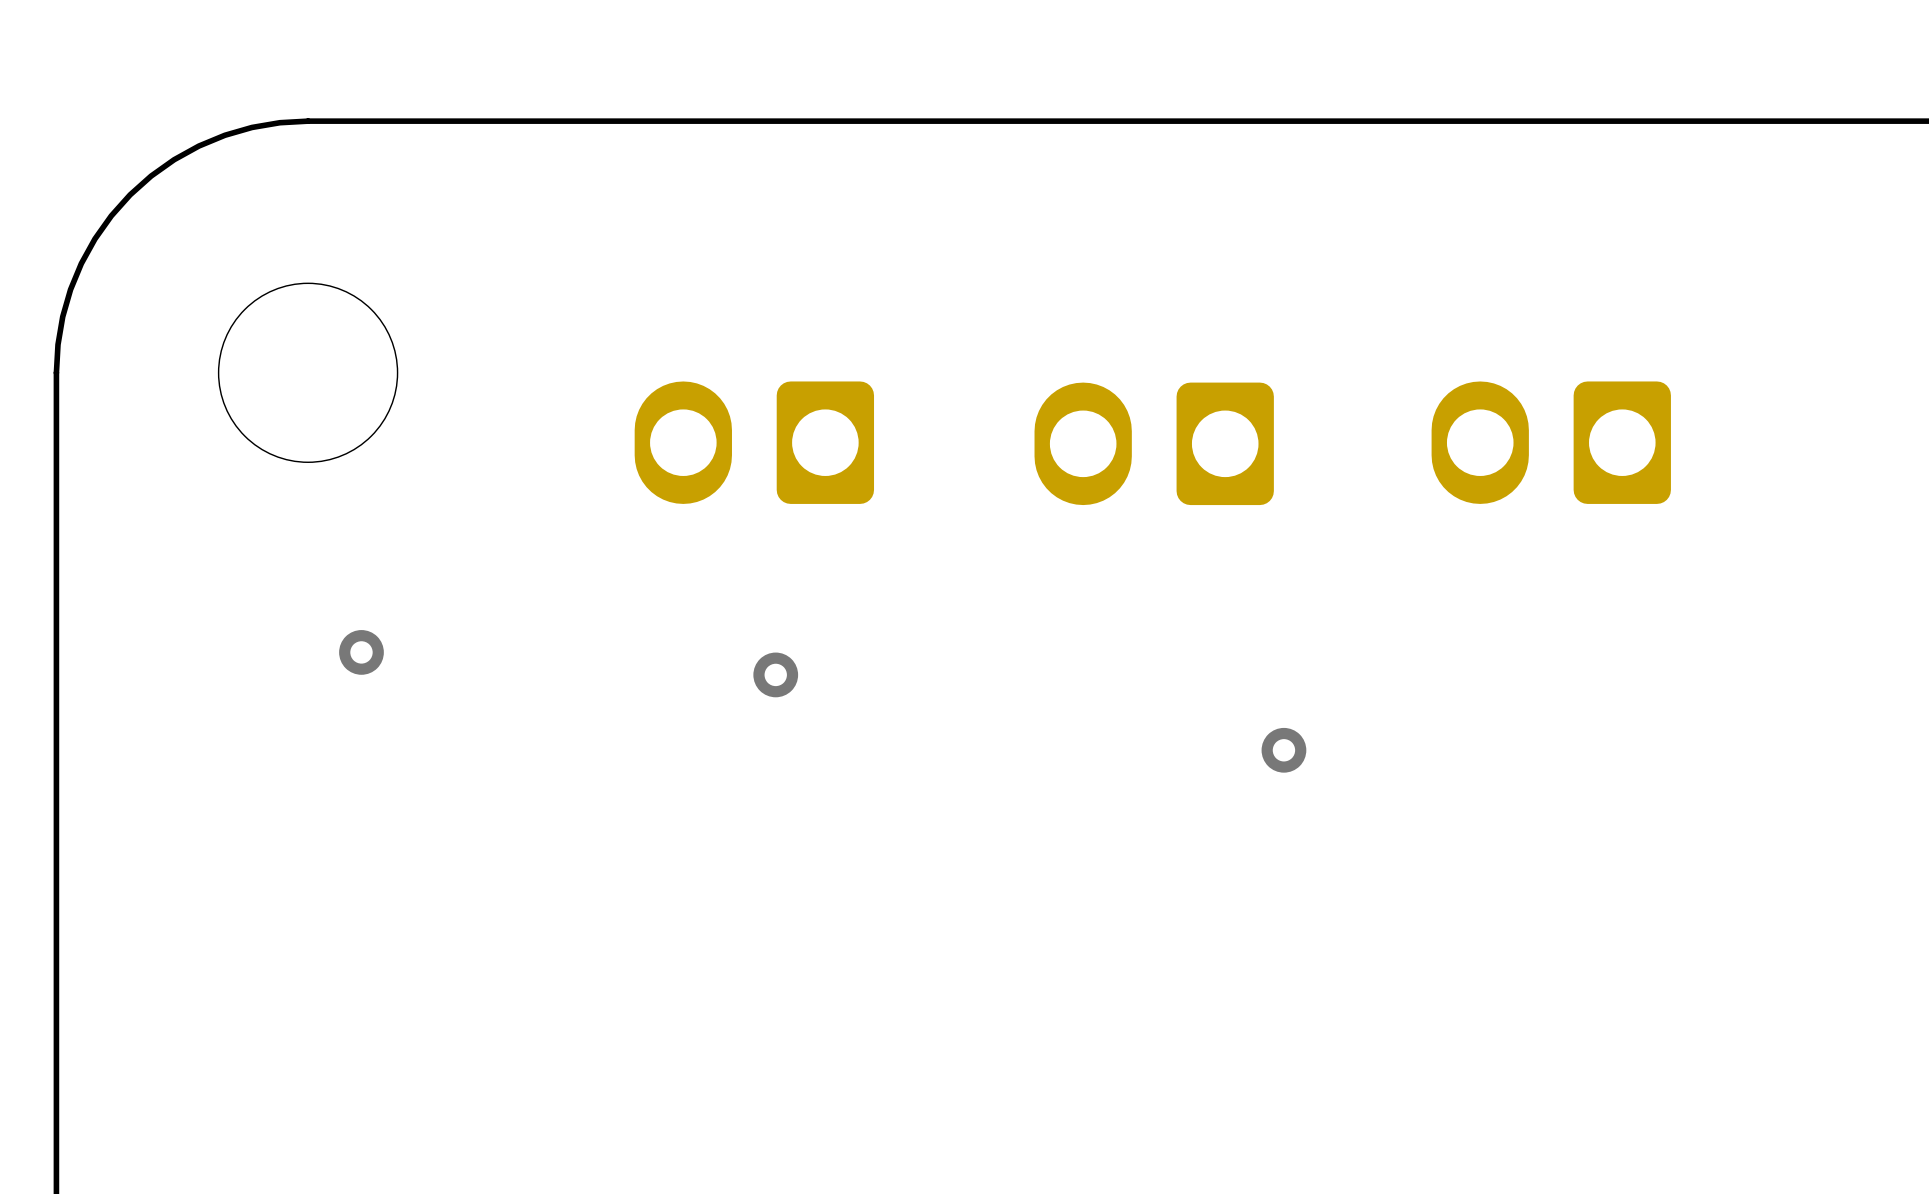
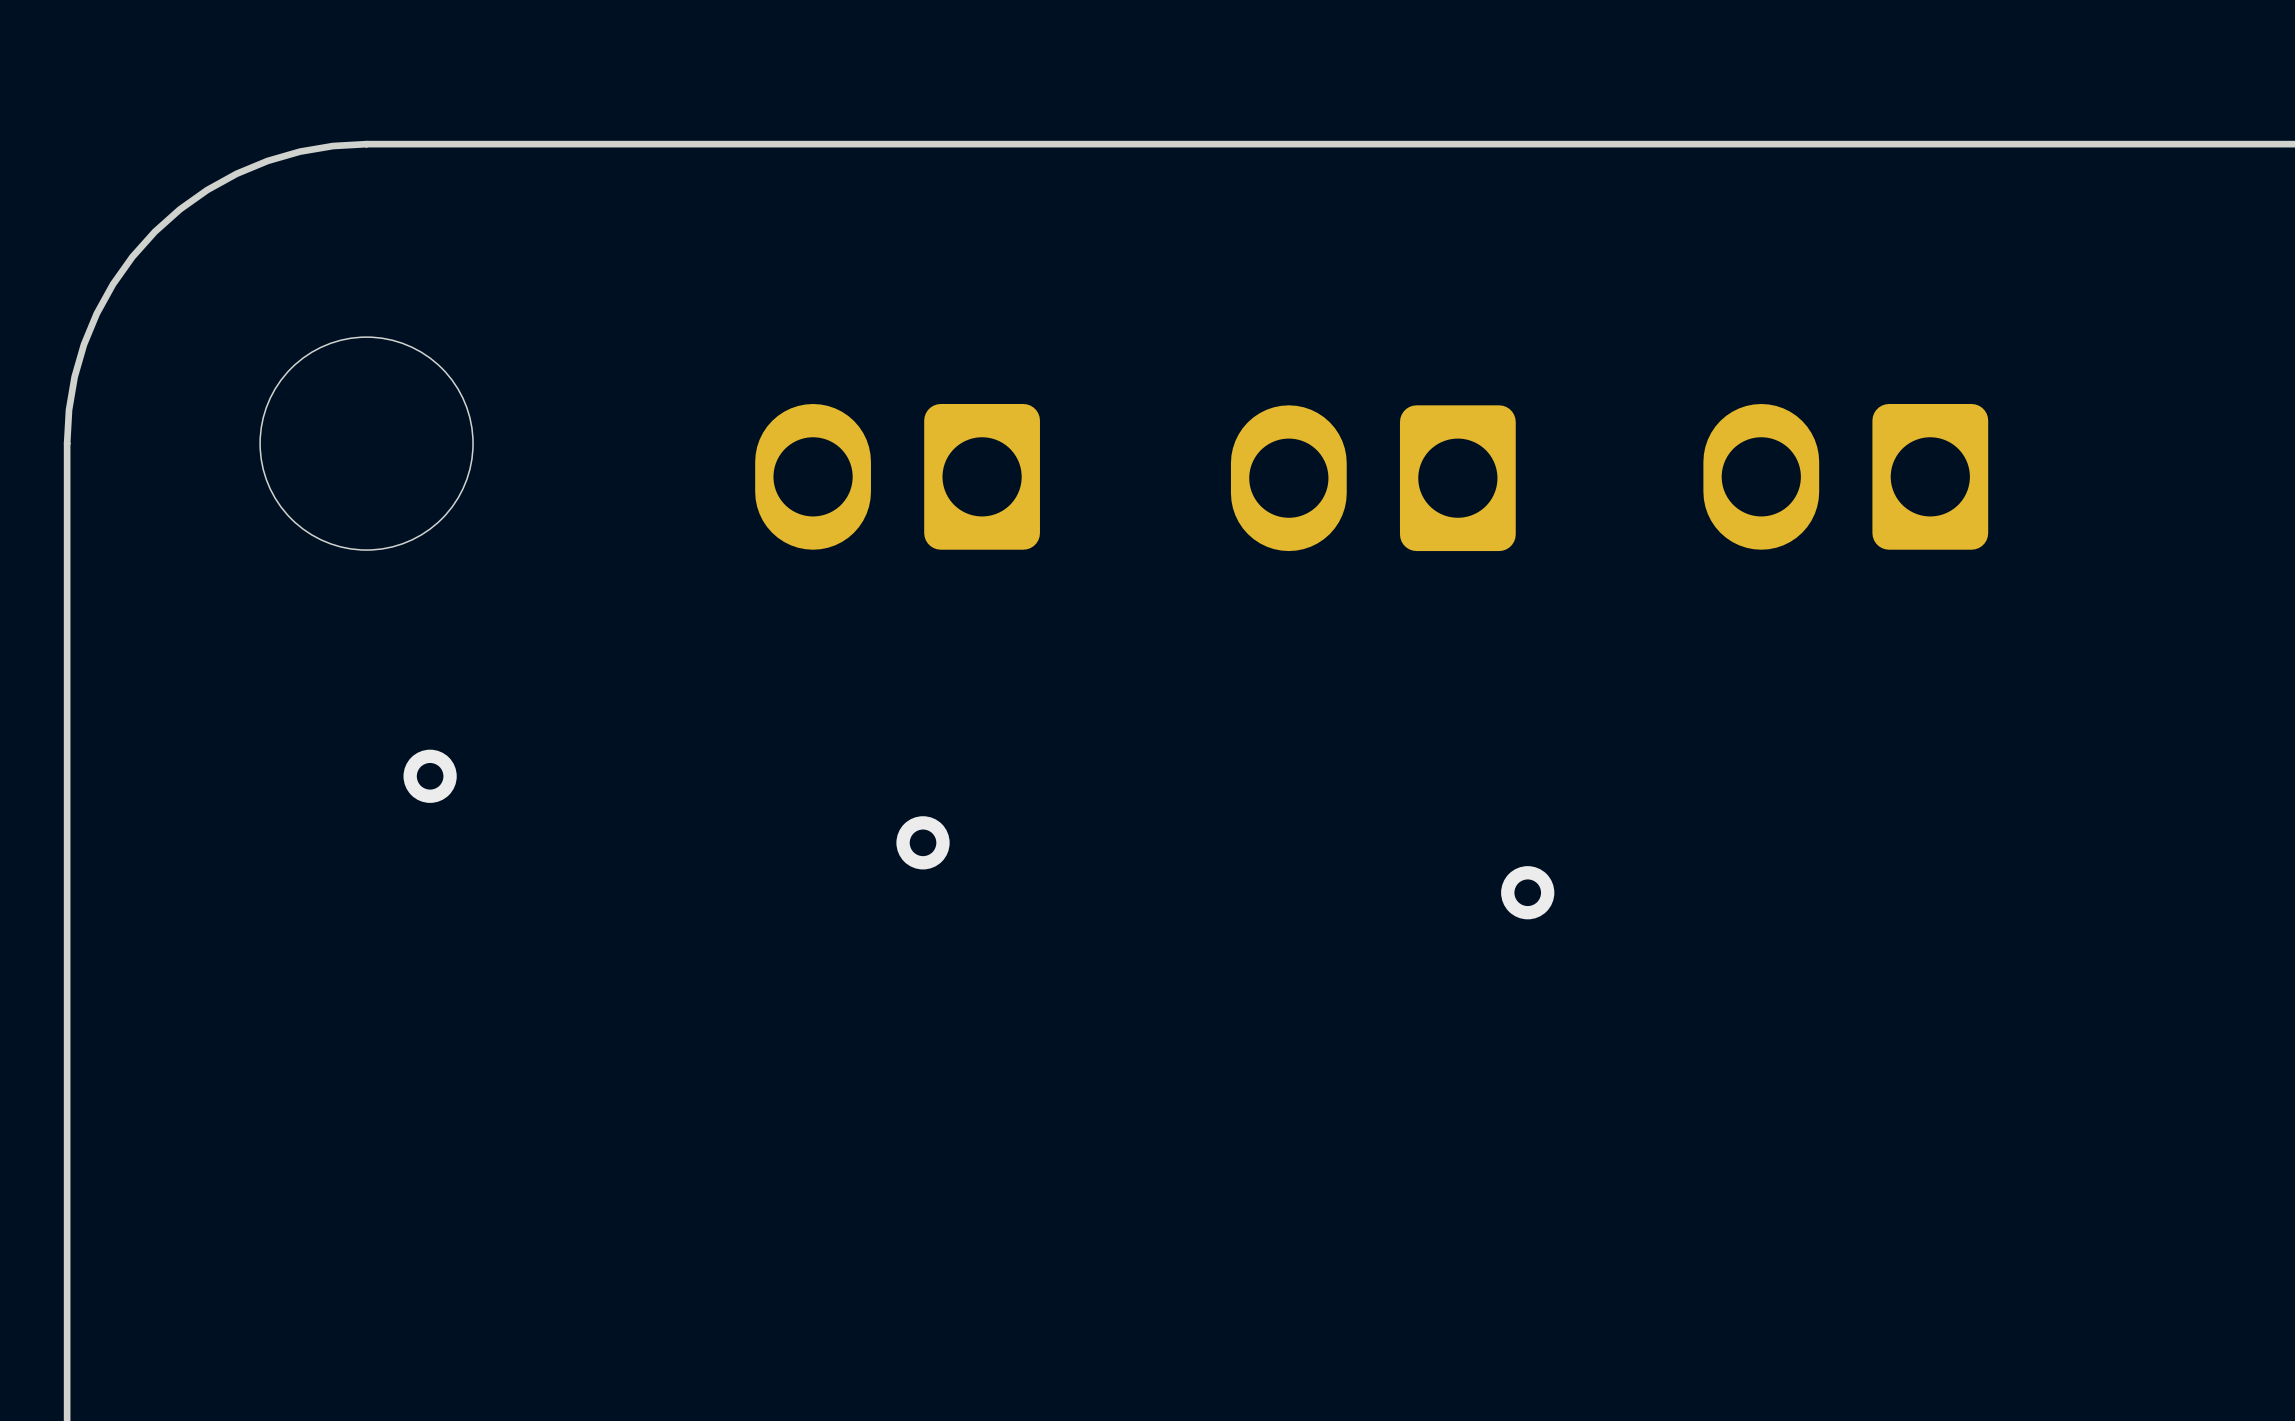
part position: (754, 442) -> (897, 476)
part position: (1551, 442) -> (1845, 476)
part position: (1154, 443) -> (1373, 478)
via position: (775, 674) -> (923, 842)

